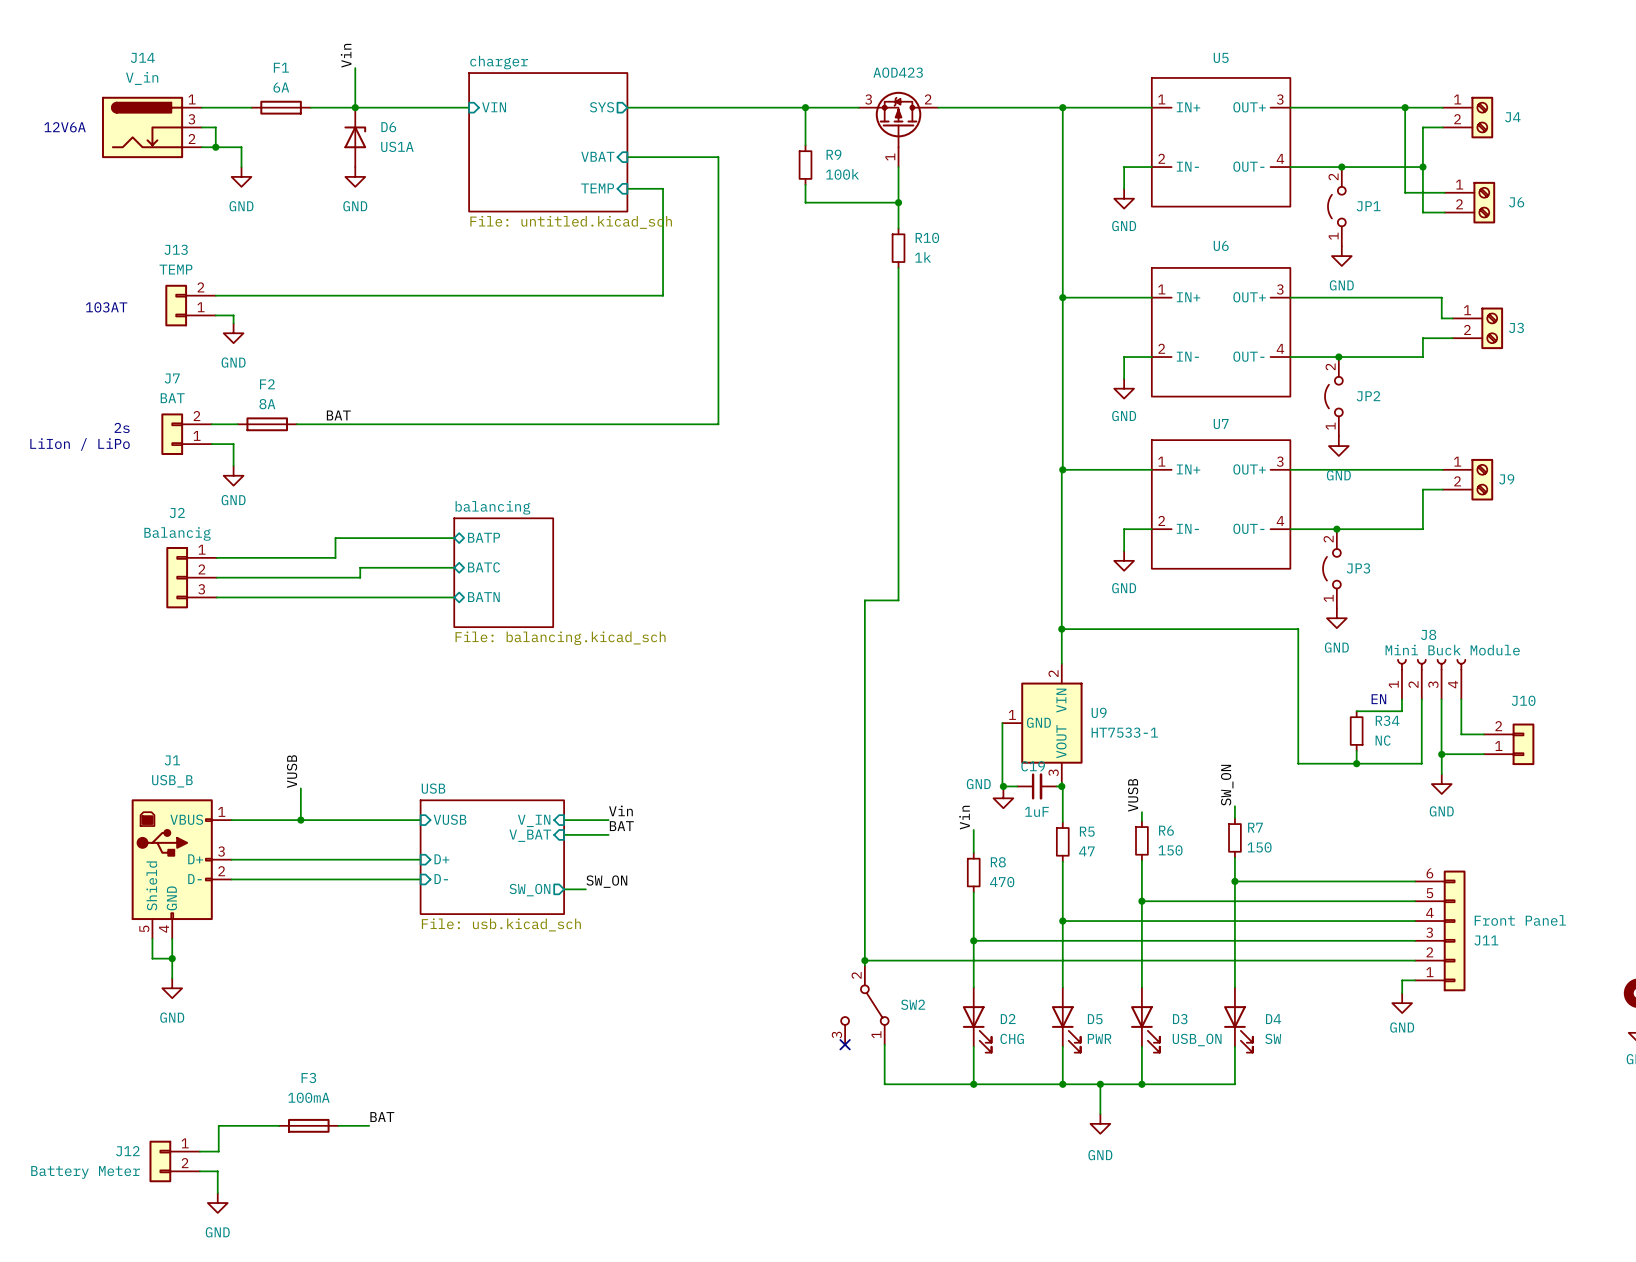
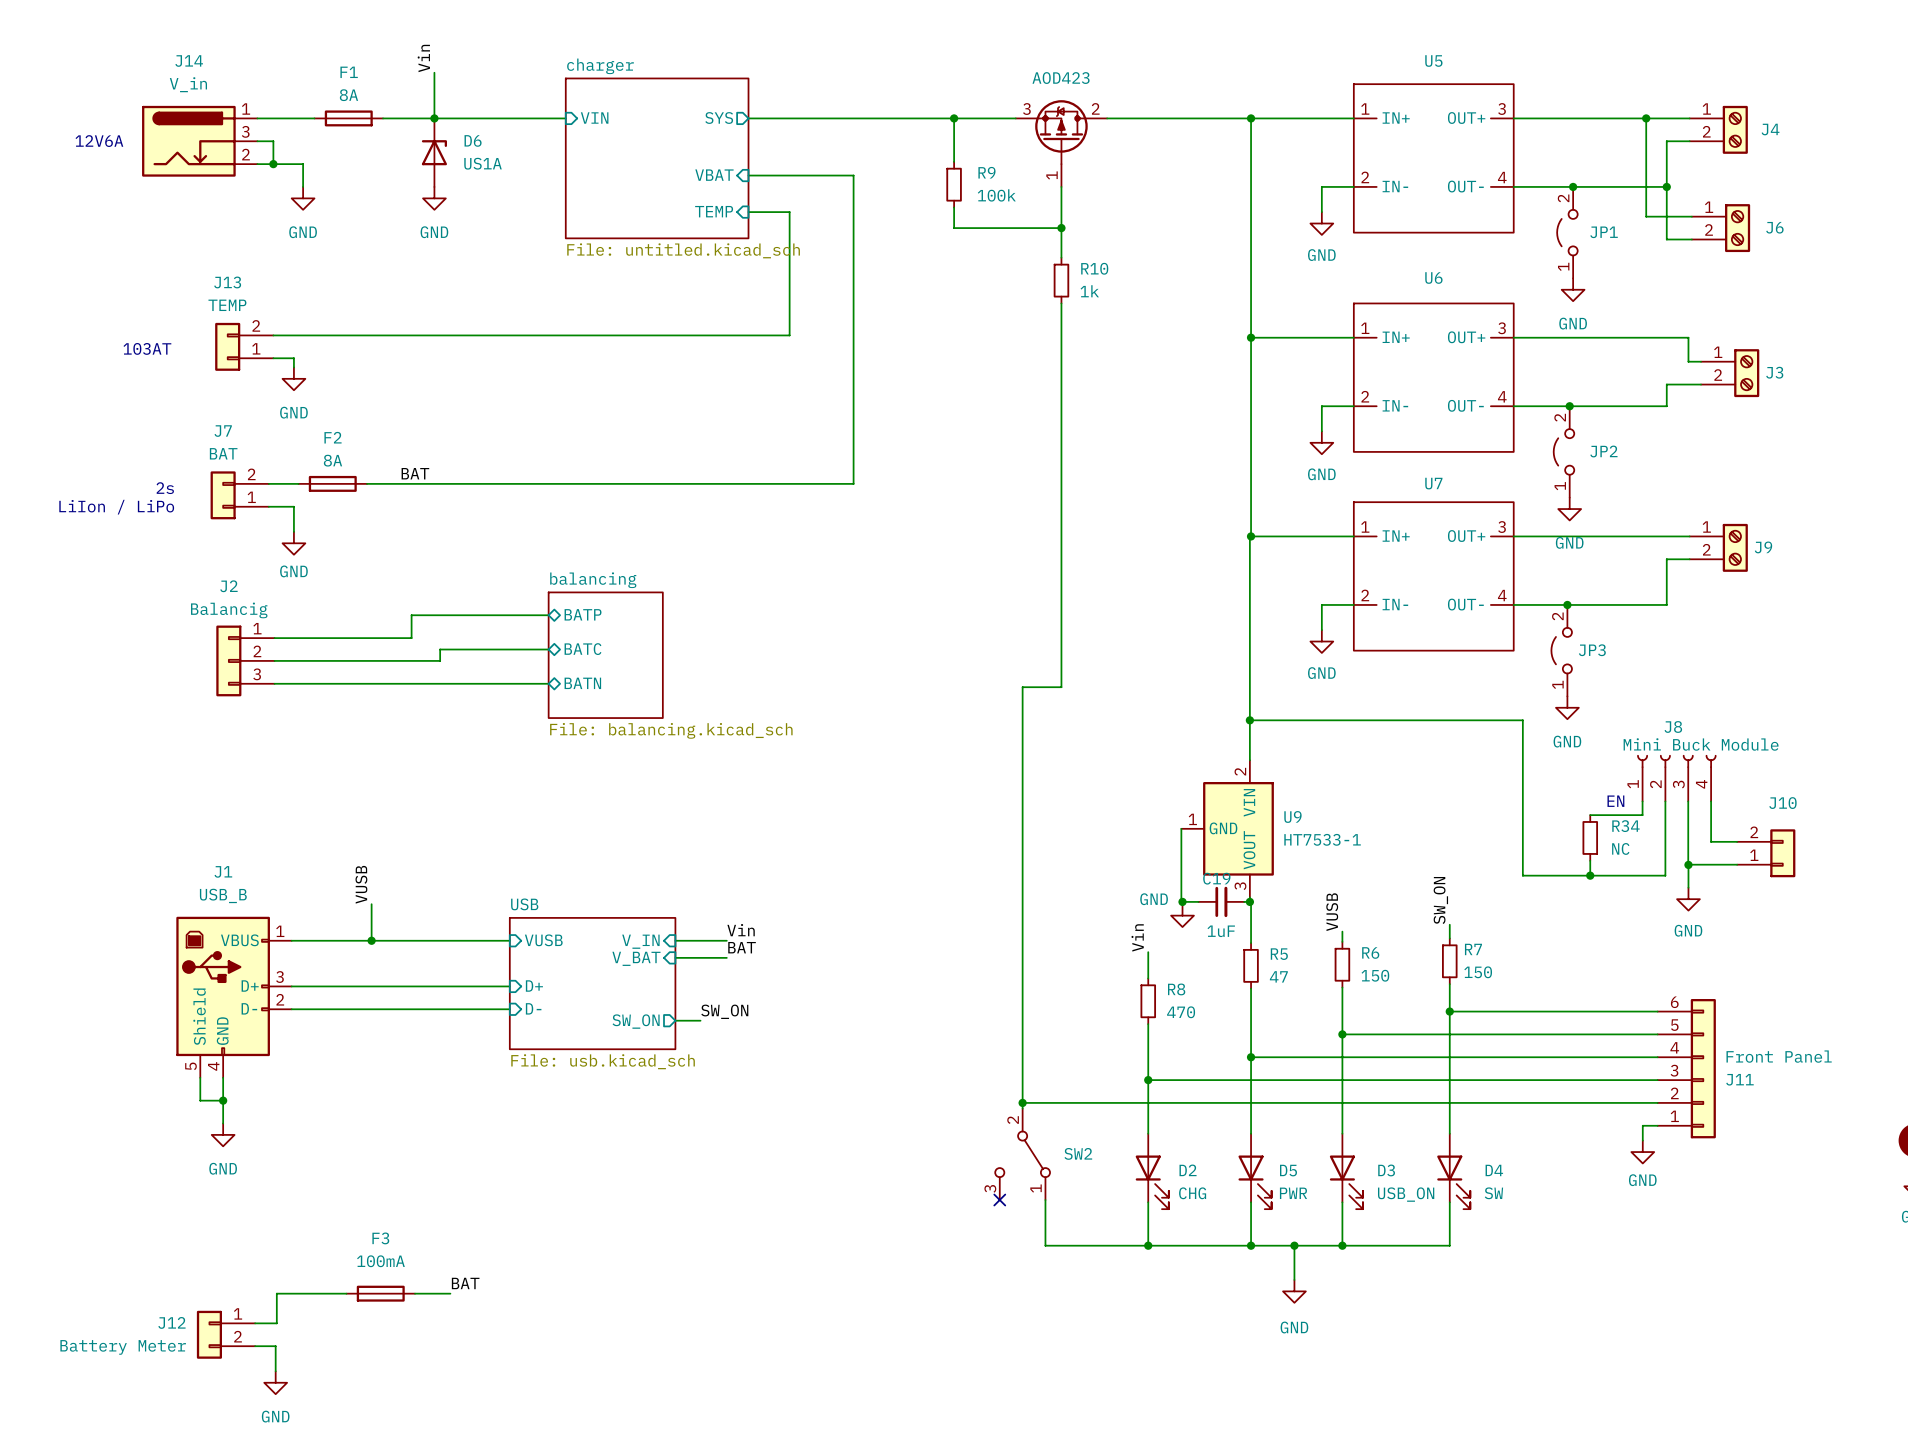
F1 value: 6A (281, 87) -> 8A (348, 95)

